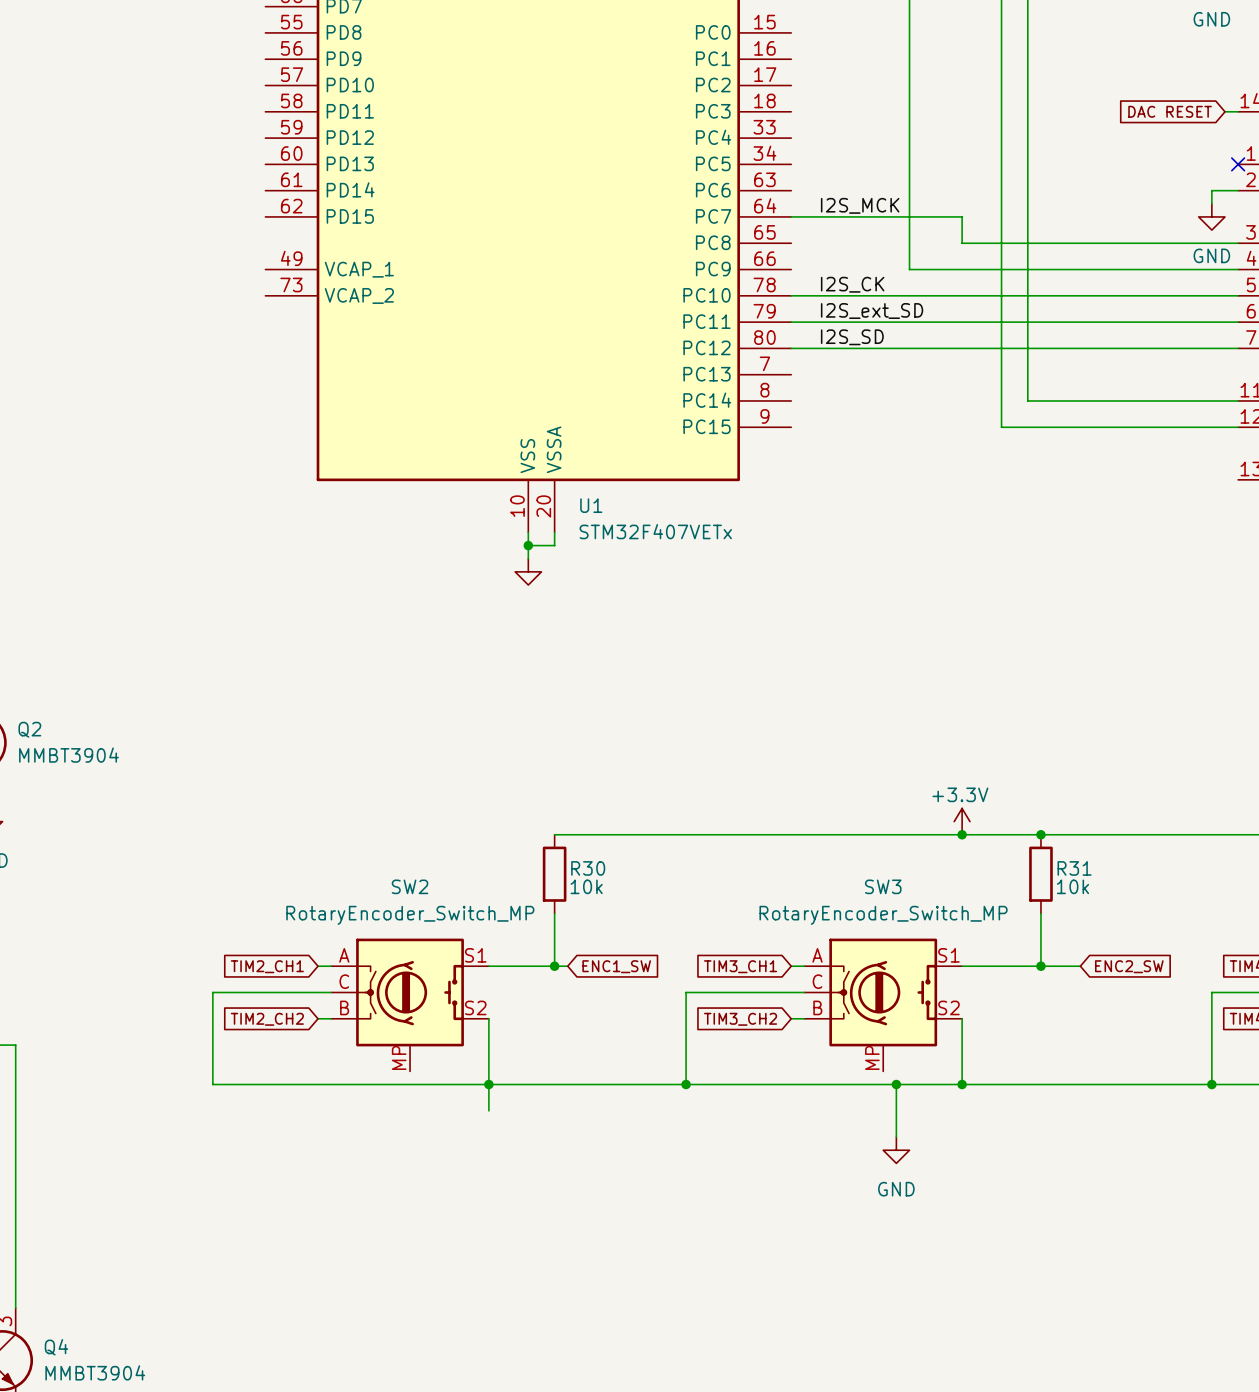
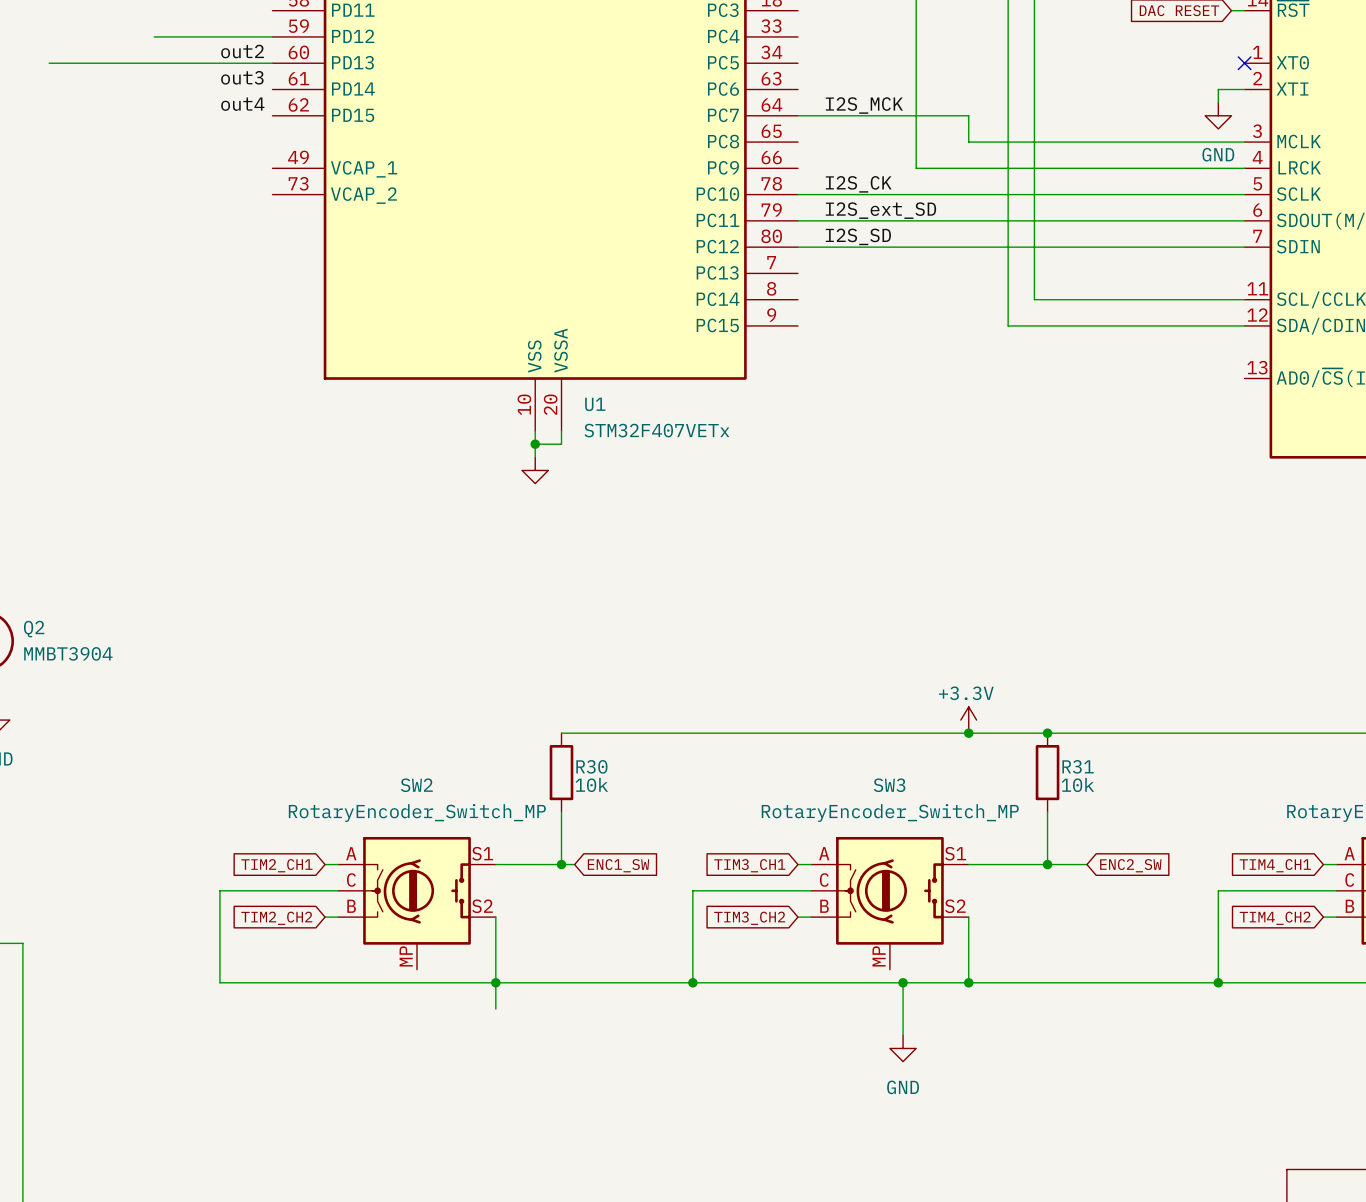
wire: none -> (154, 36) (272, 36)
label: none -> out2 (242, 51)
wire: none -> (49, 63) (272, 63)
label: none -> out3 (242, 77)
label: none -> out4 (242, 104)

